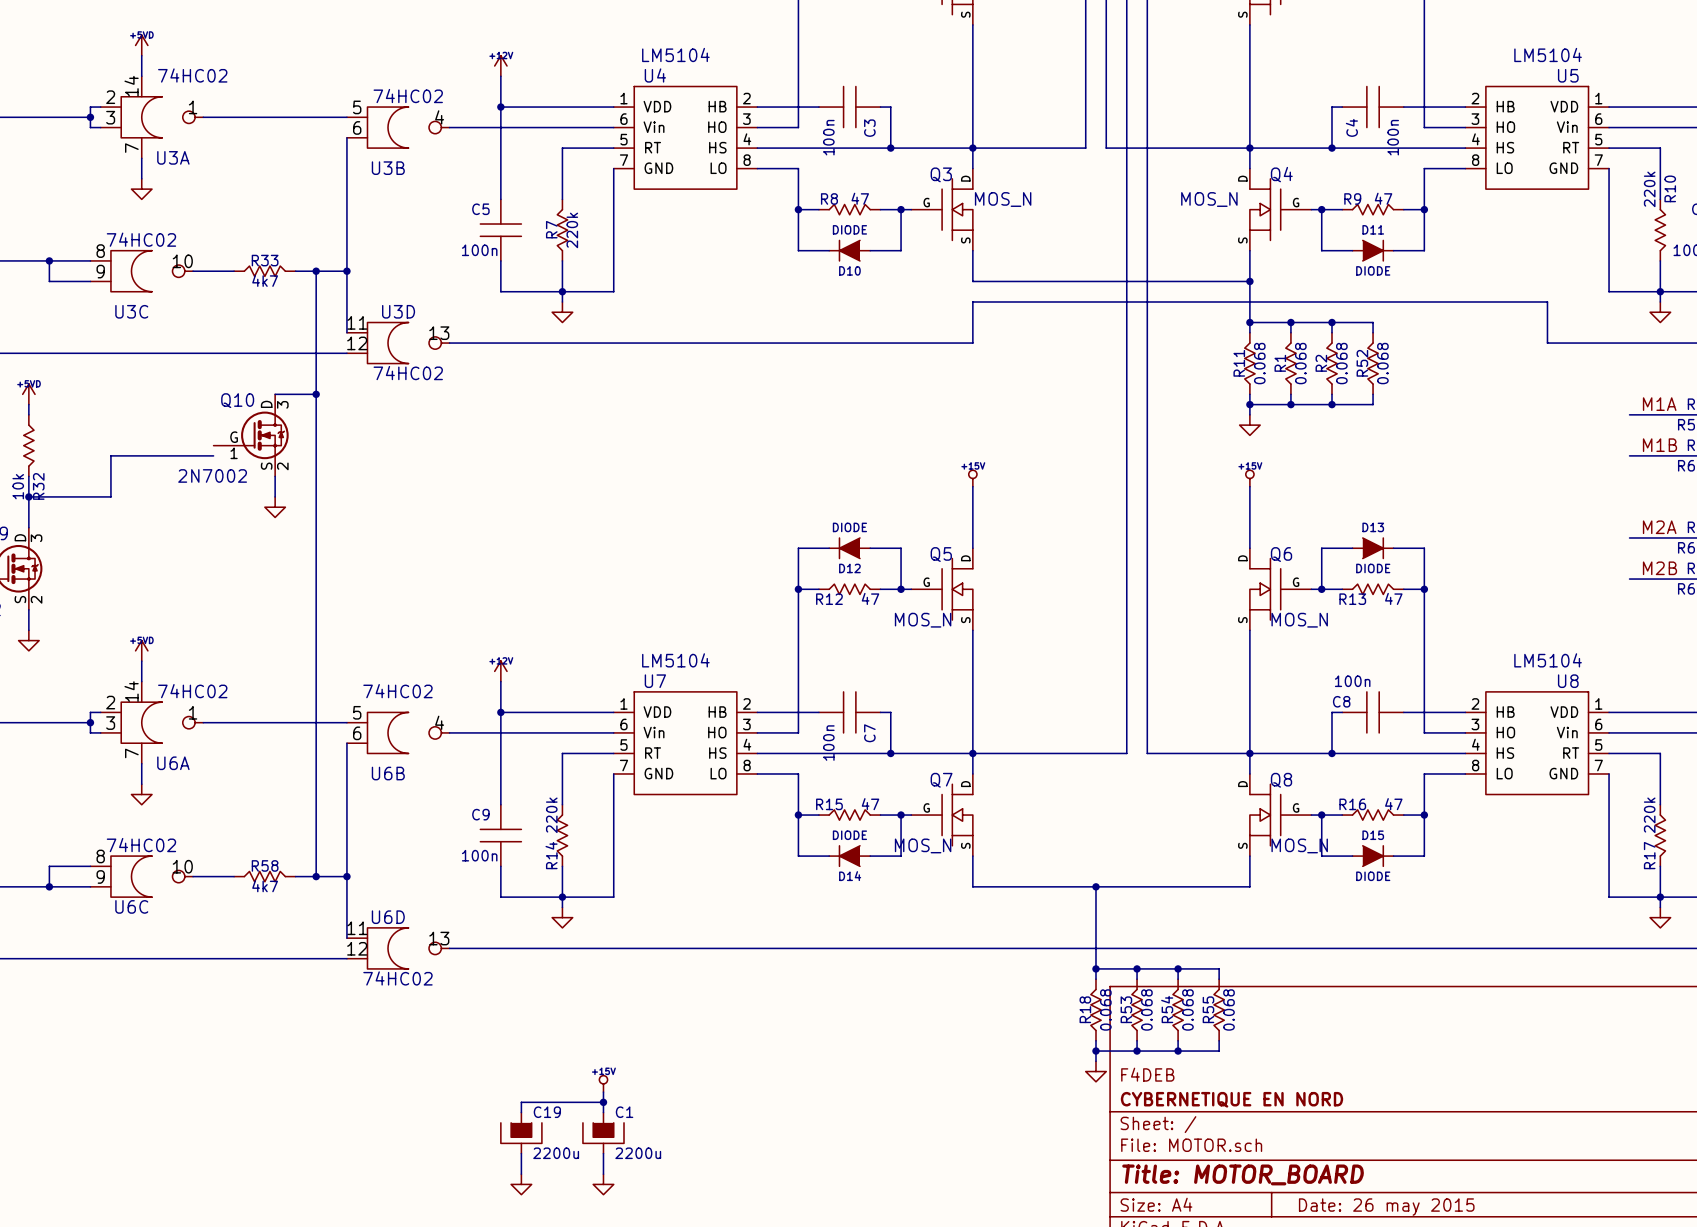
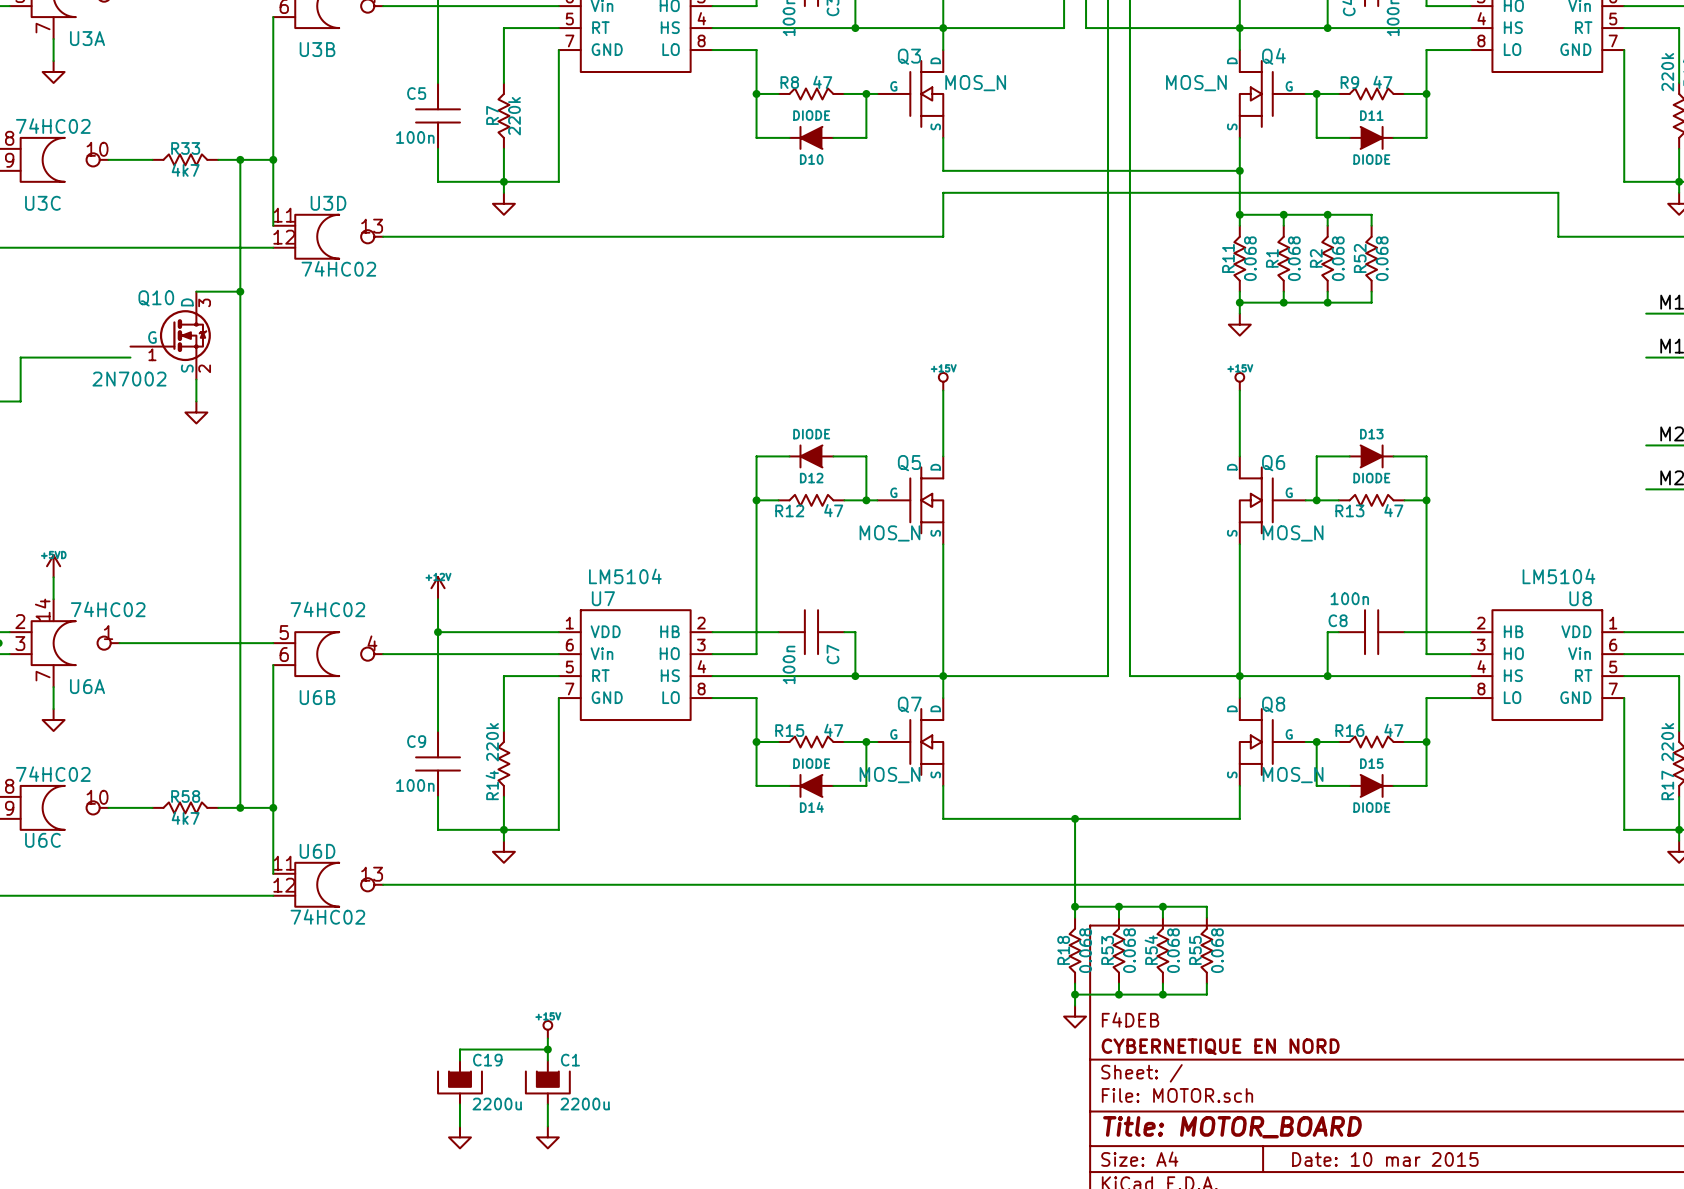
title block: Date: 26 may 2015 (1386, 1207) -> Date: 10 mar 2015 (1385, 1159)

